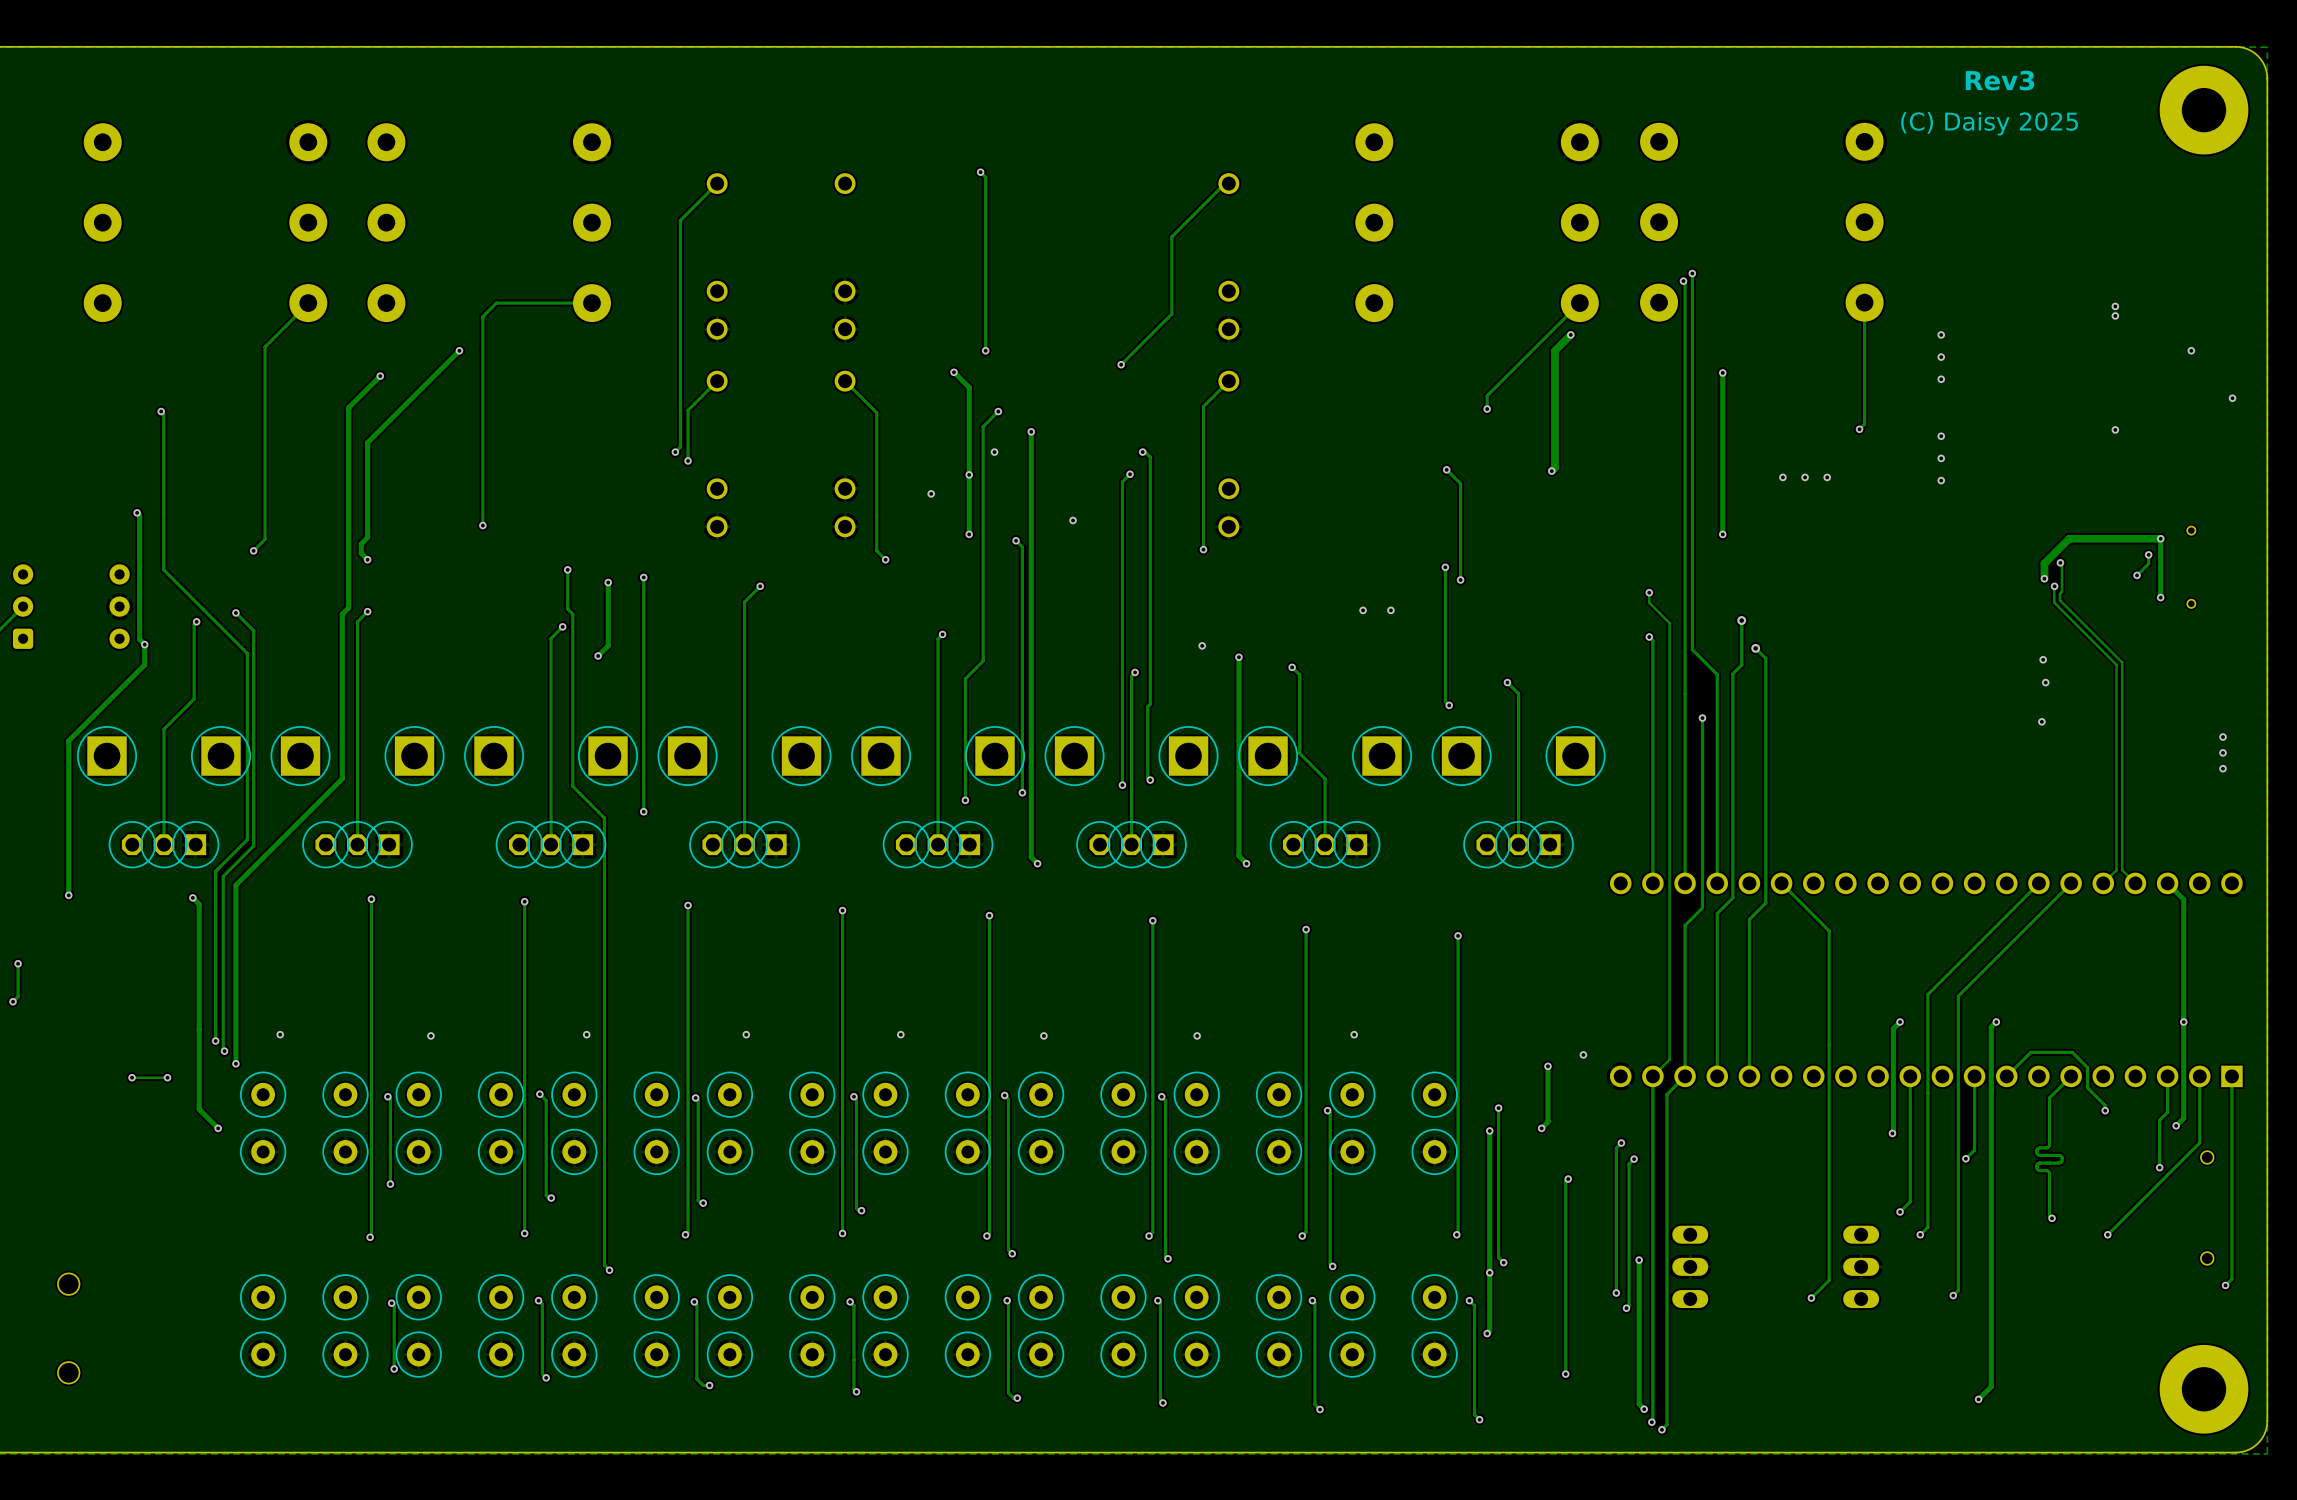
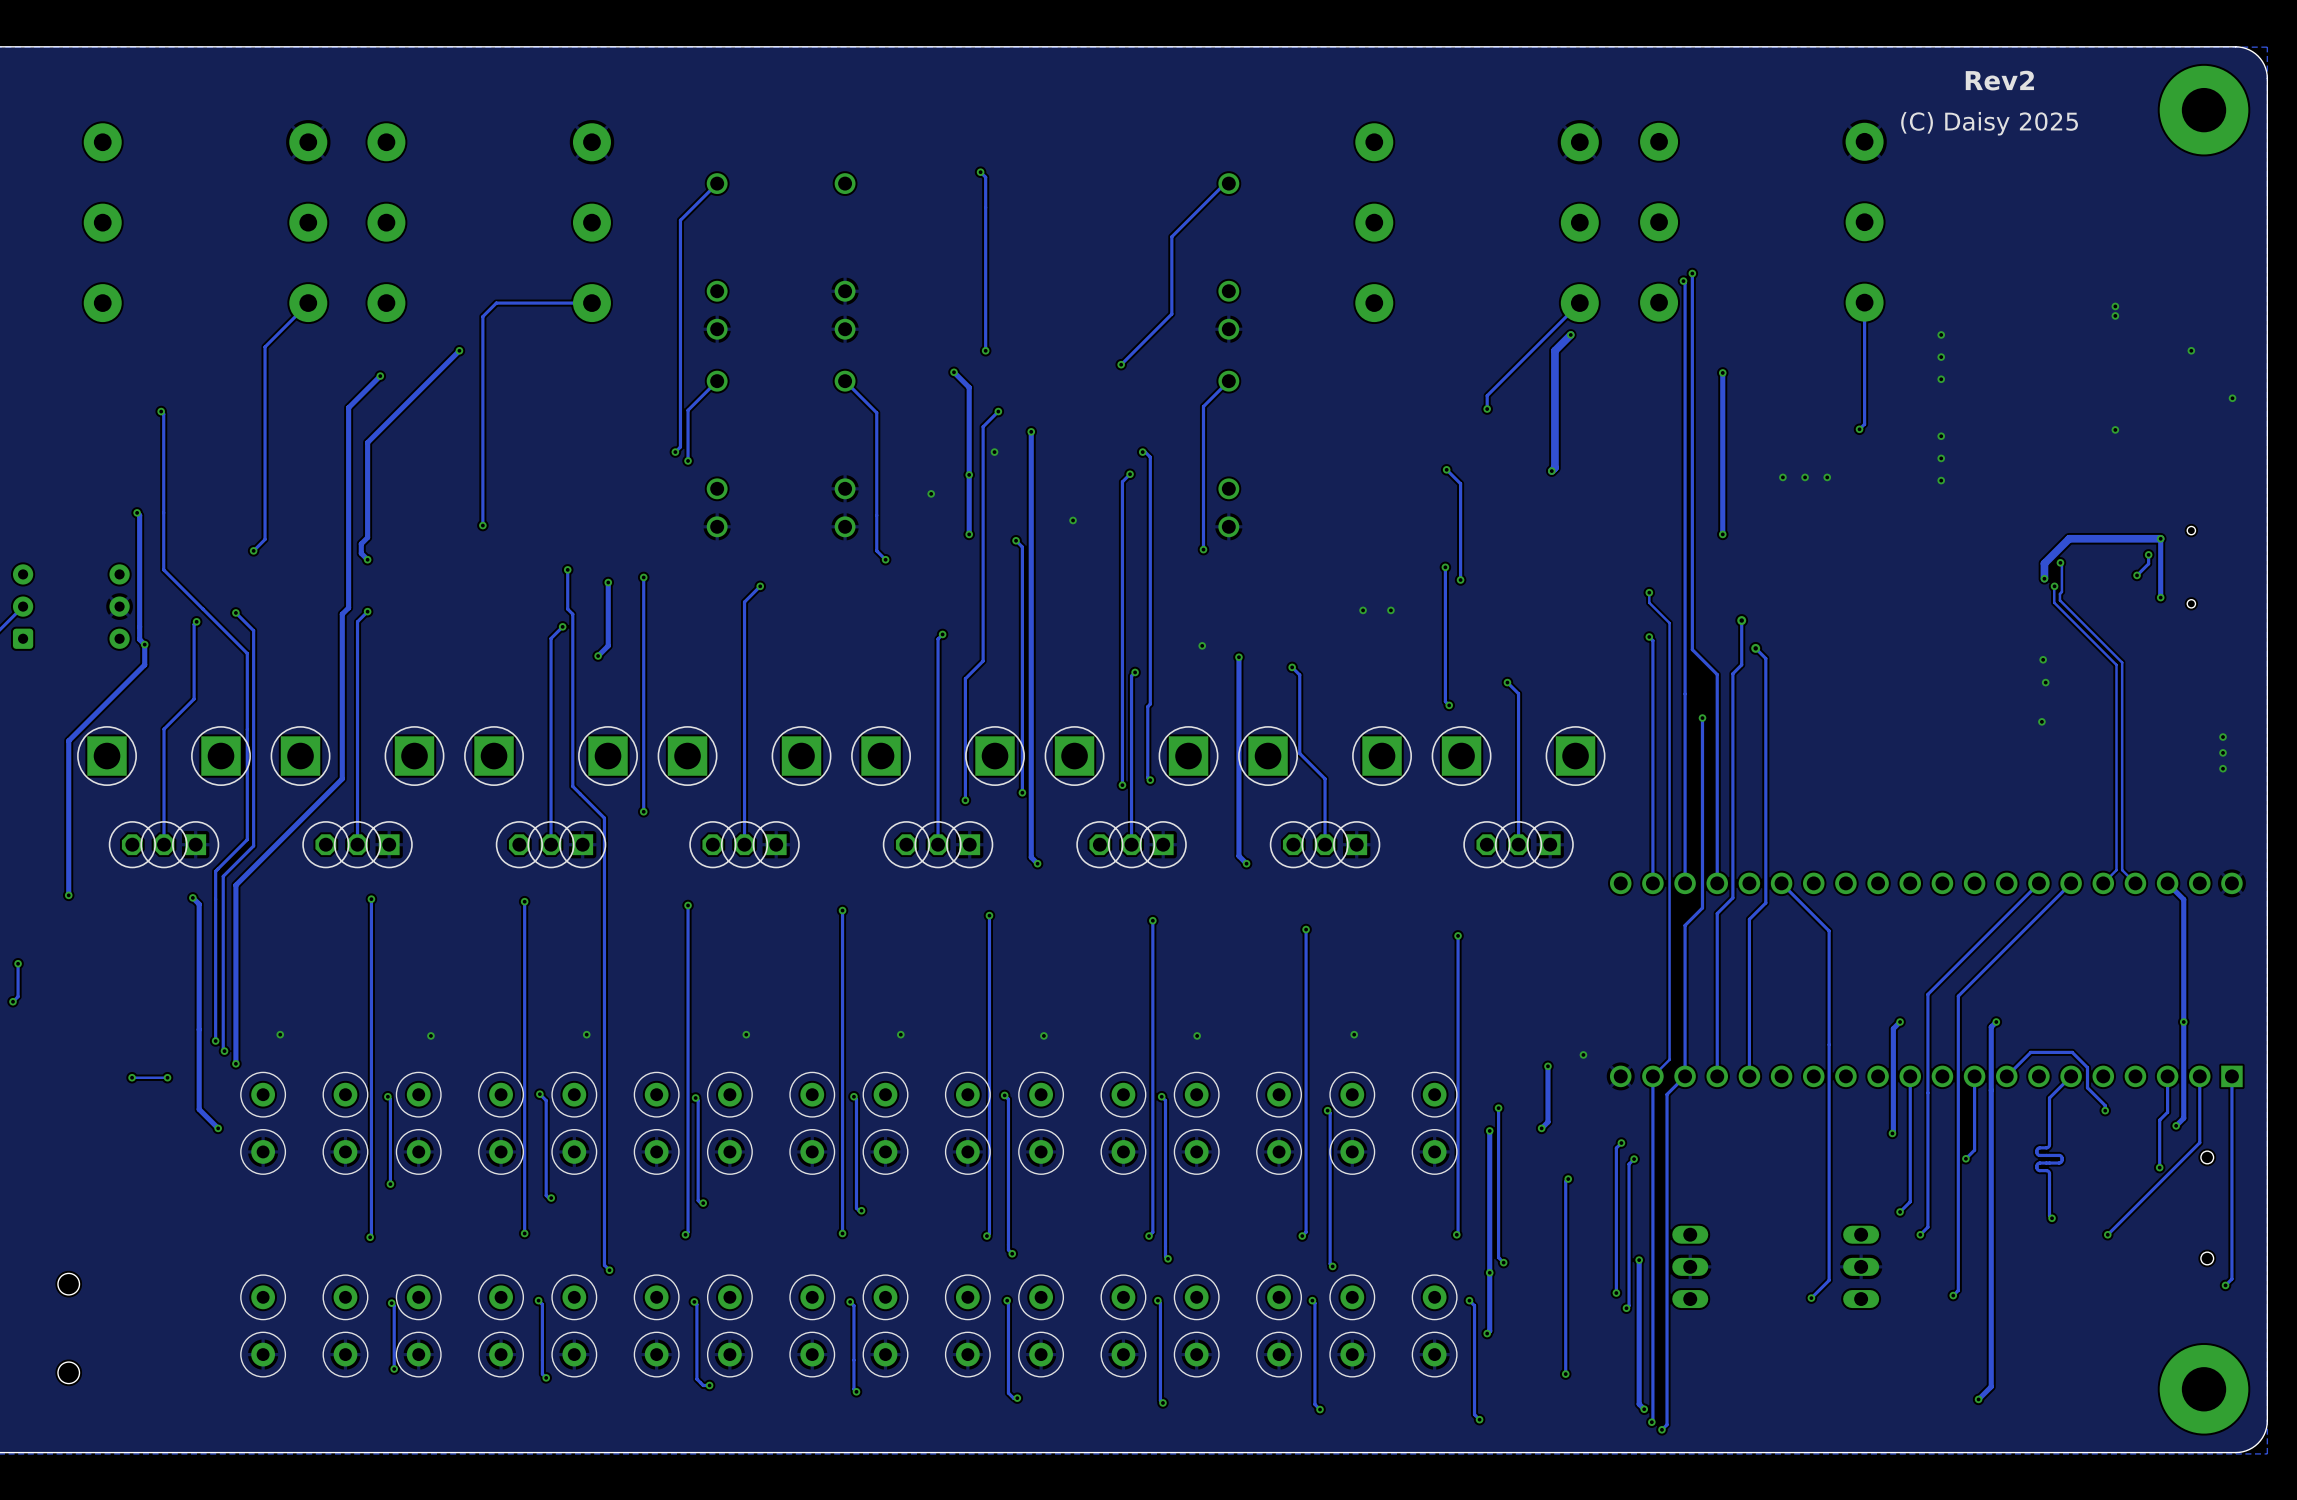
text: Rev3 (1999, 80) -> Rev2 (1999, 80)

